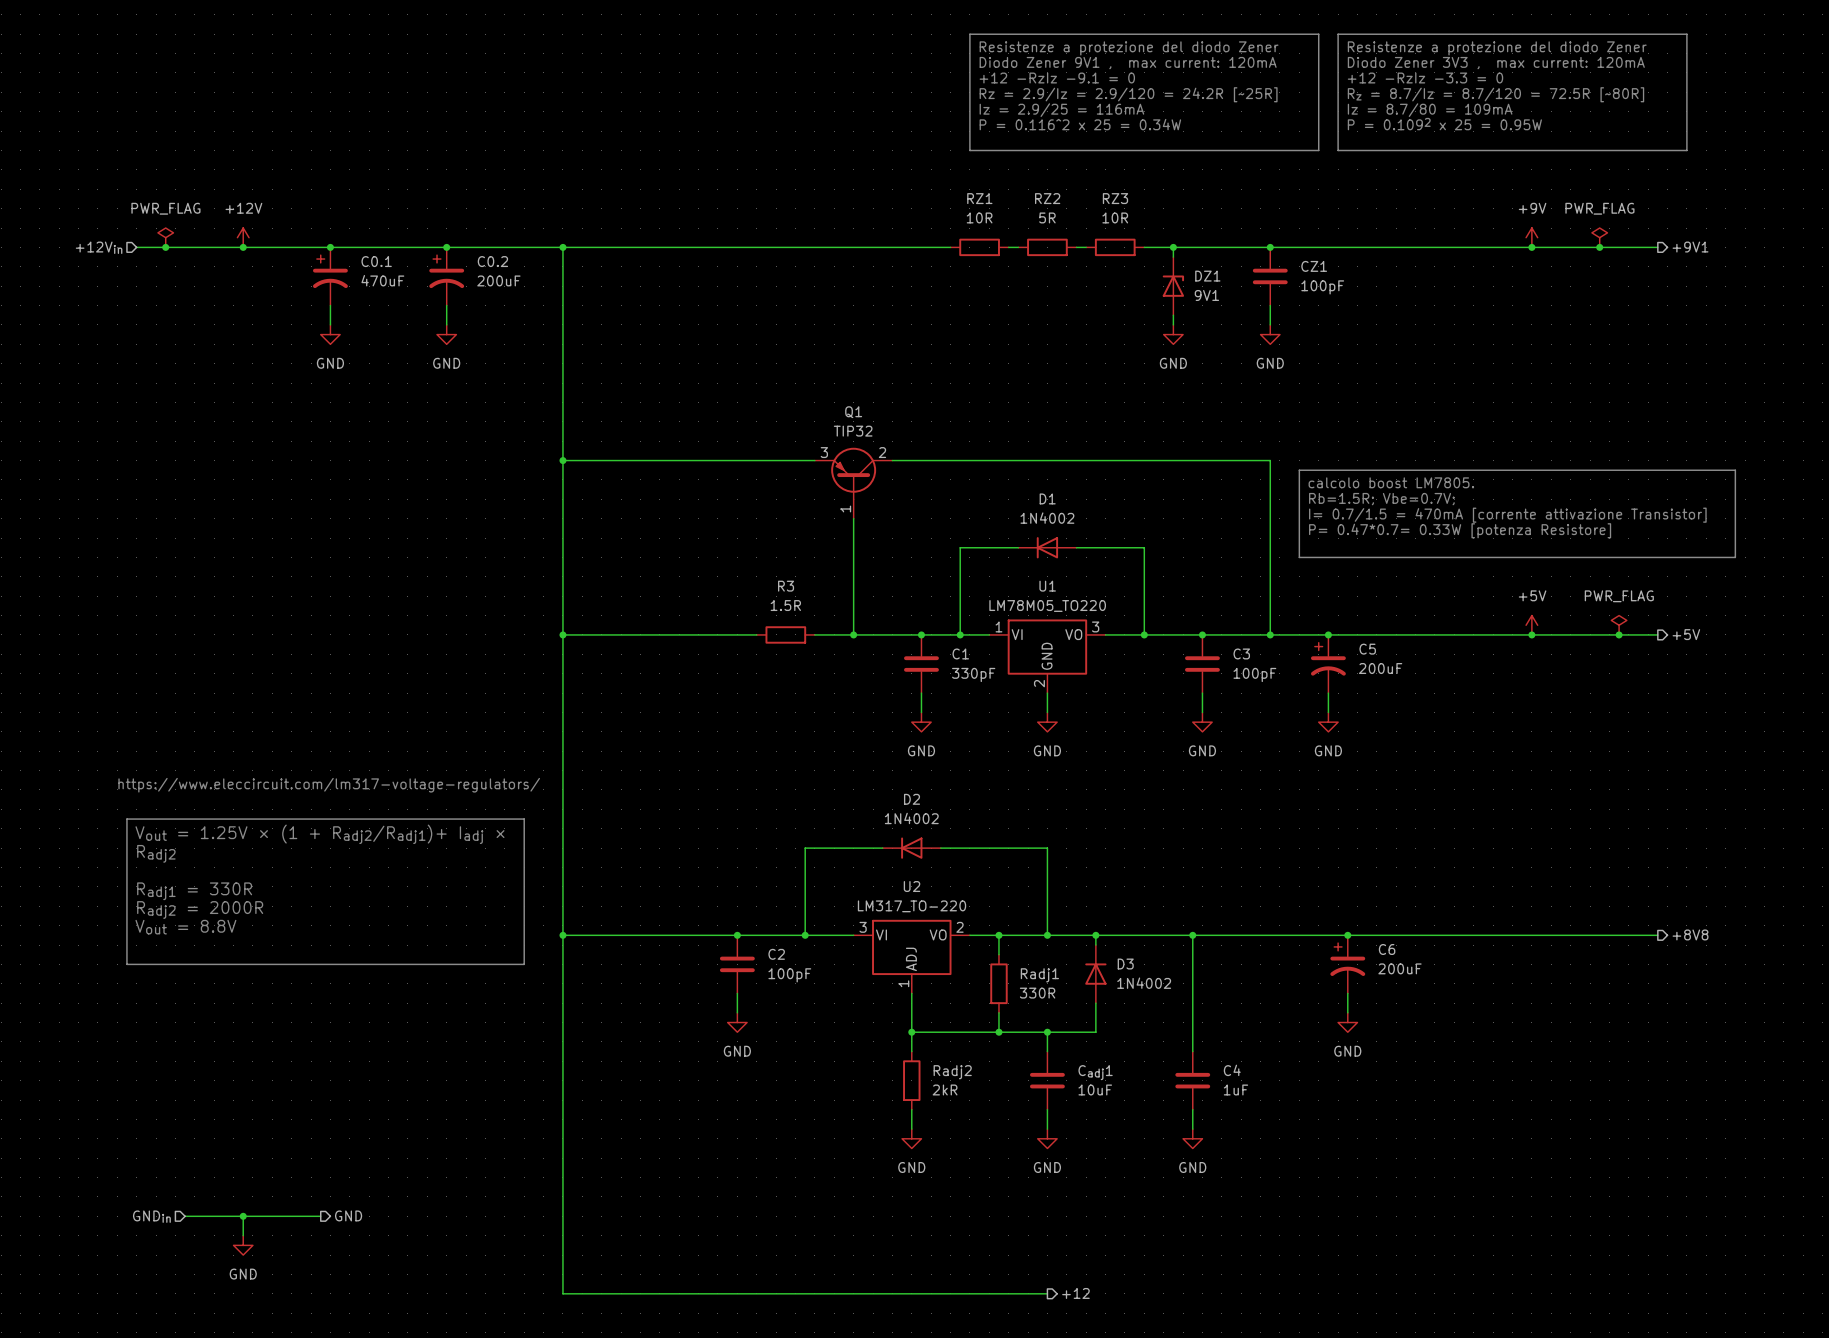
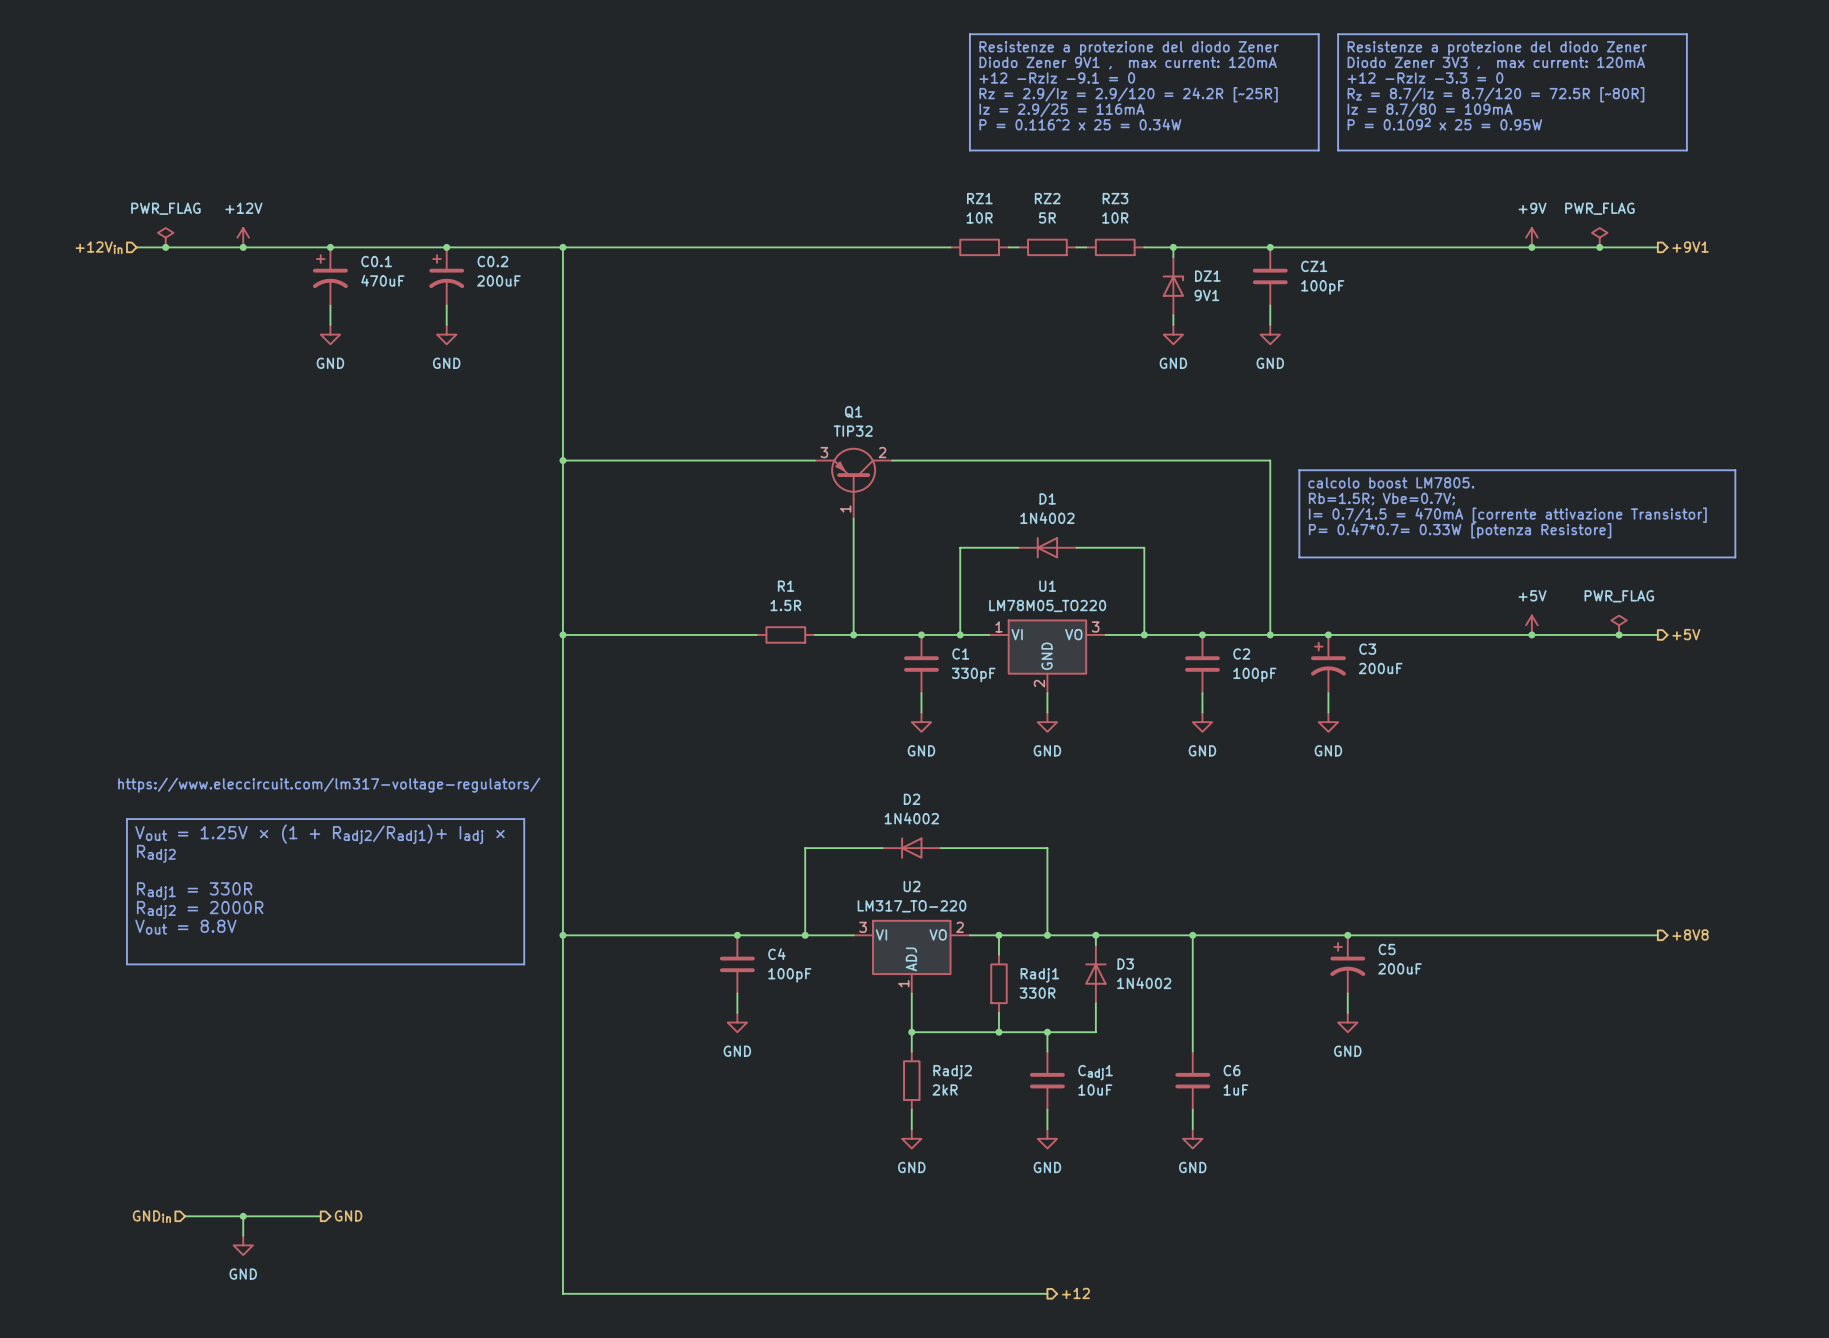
R3 name: R3 (786, 586) -> R1 (786, 586)
C5 name: C5 (1367, 649) -> C3 (1367, 649)
C3 name: C3 (1241, 653) -> C2 (1241, 653)
C6 name: C6 (1387, 949) -> C5 (1387, 949)
C2 name: C2 (776, 954) -> C4 (776, 954)
C4 name: C4 (1232, 1070) -> C6 (1232, 1070)

